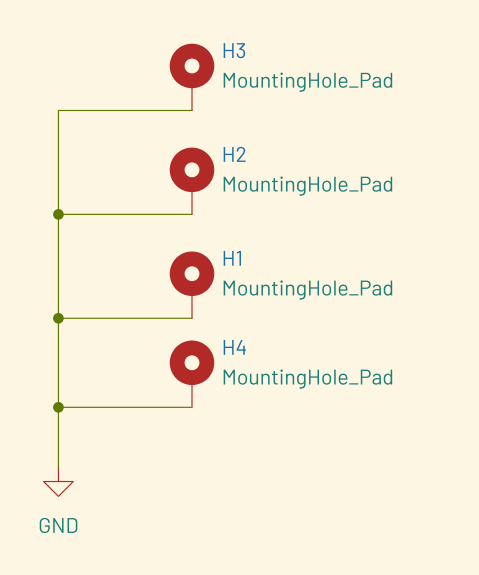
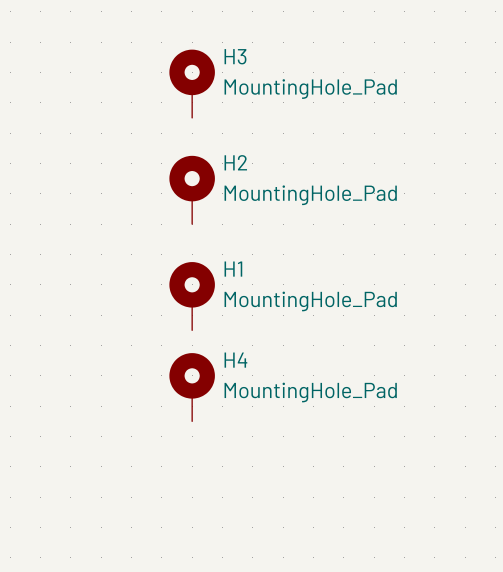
wire: (192, 110) (58, 110) (58, 466) -> none
wire: (58, 214) (192, 214) -> none
junction: (58, 214) -> none
wire: (58, 318) (192, 318) -> none
junction: (58, 318) -> none
wire: (58, 407) (192, 407) -> none
junction: (58, 407) -> none
power symbol: GND (58, 481) -> none

